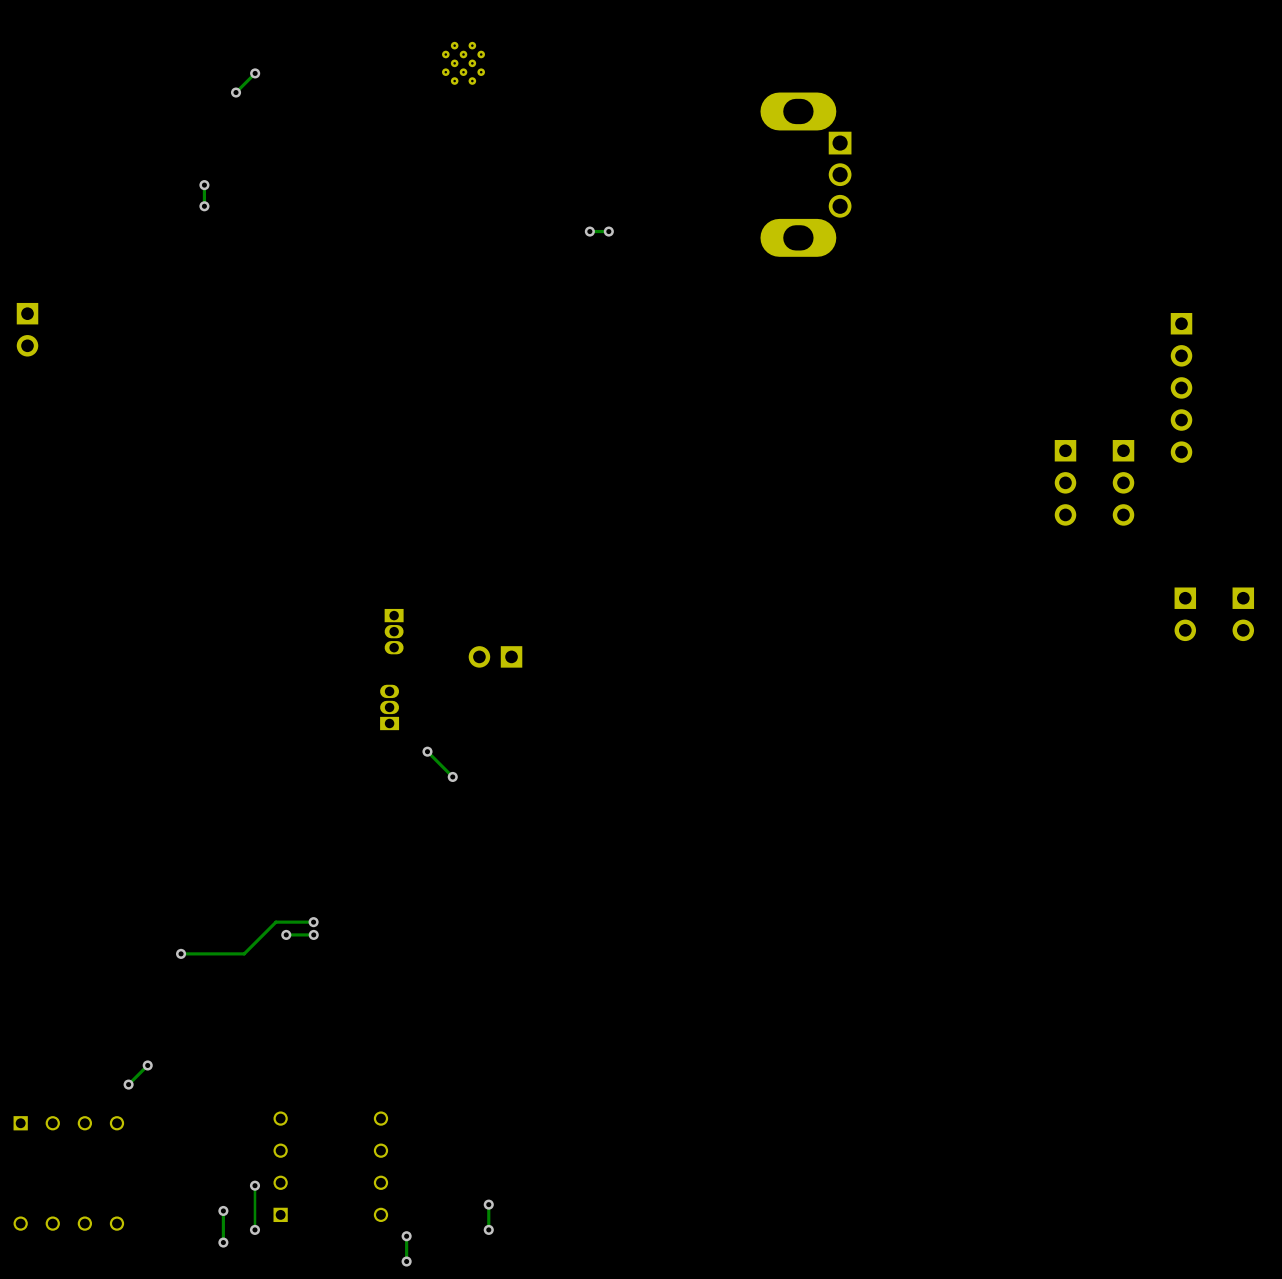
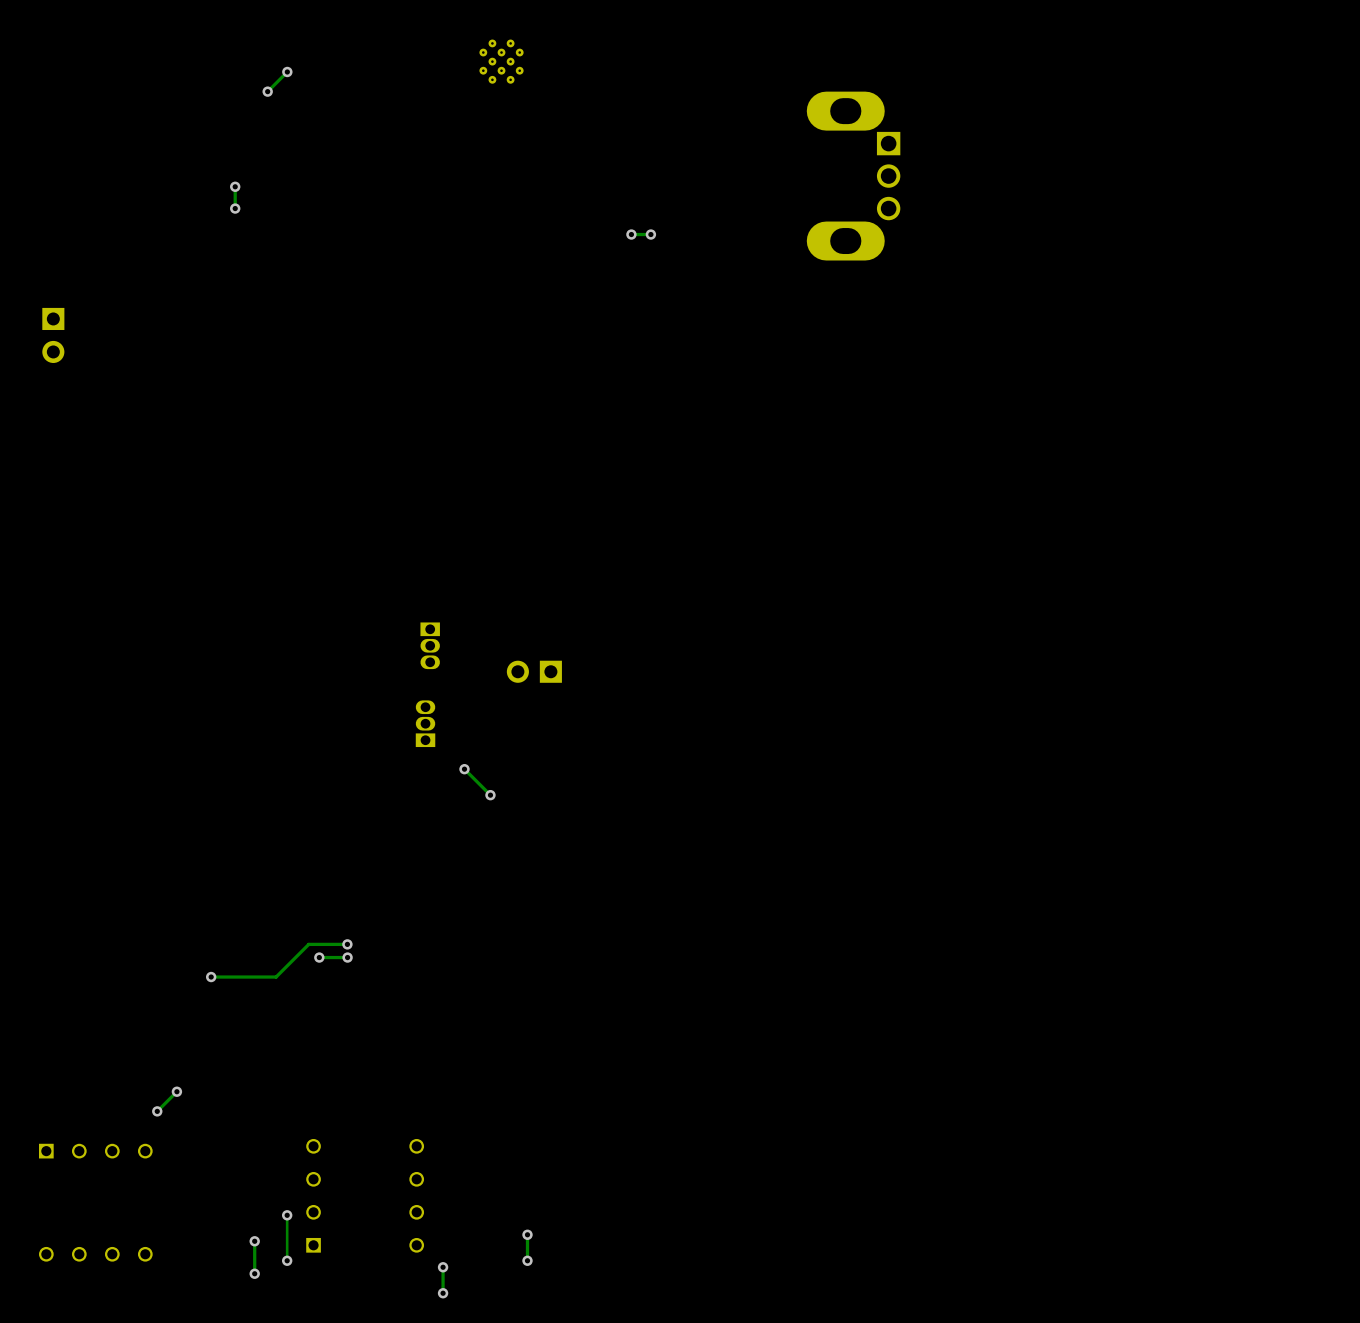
part: (1181, 387) -> none
part: (1065, 482) -> none
part: (1123, 482) -> none
part: (1185, 614) -> none
part: (1243, 614) -> none

